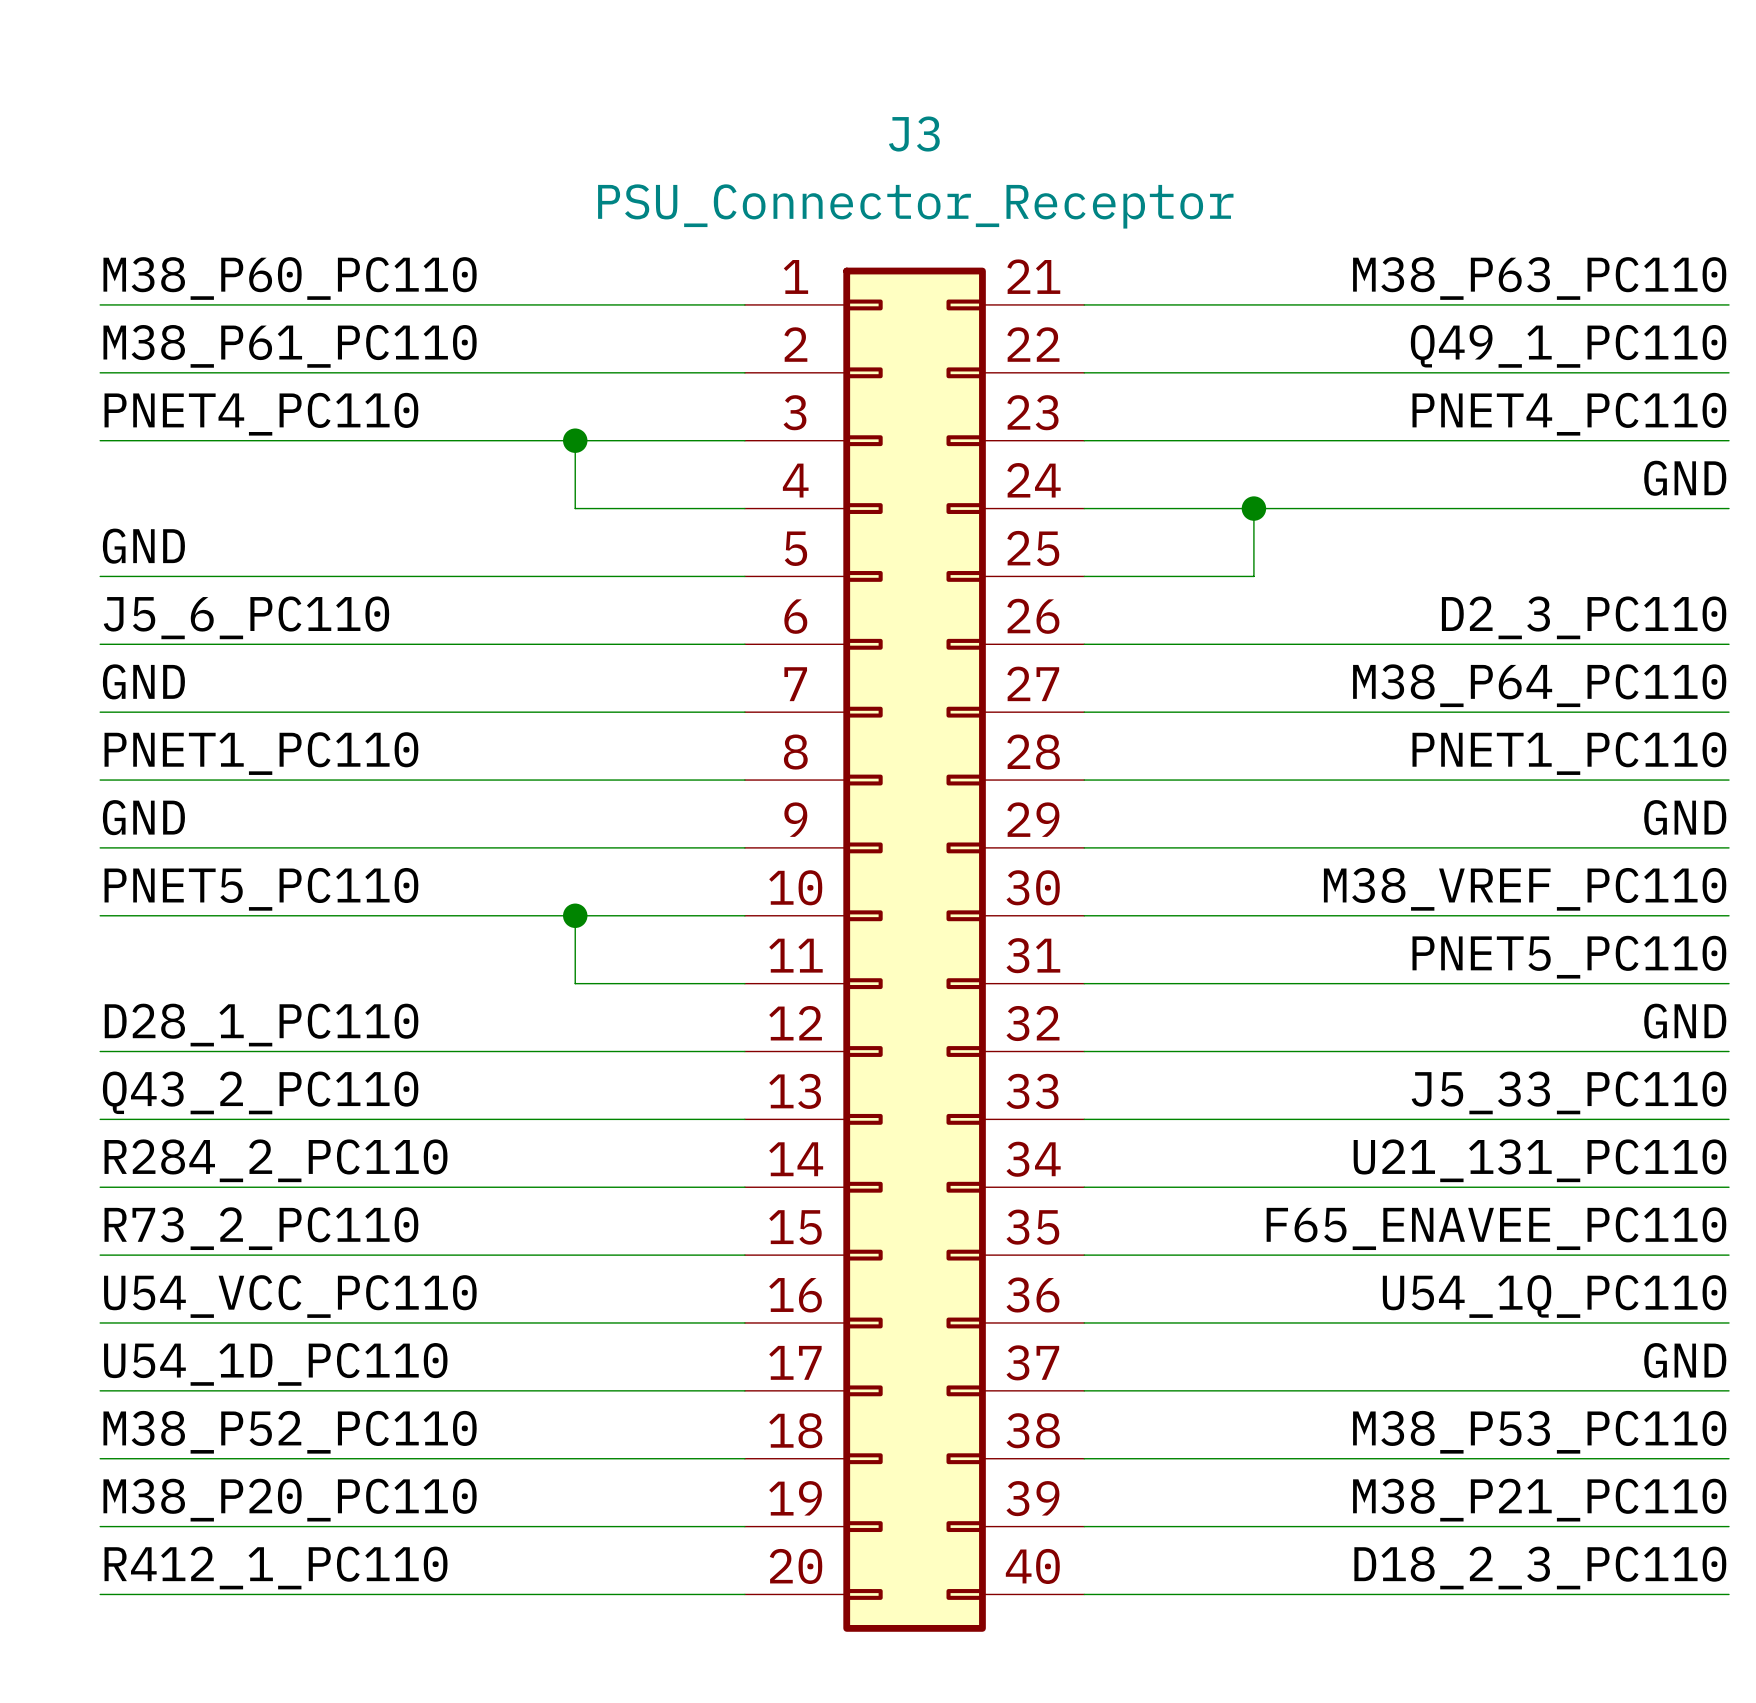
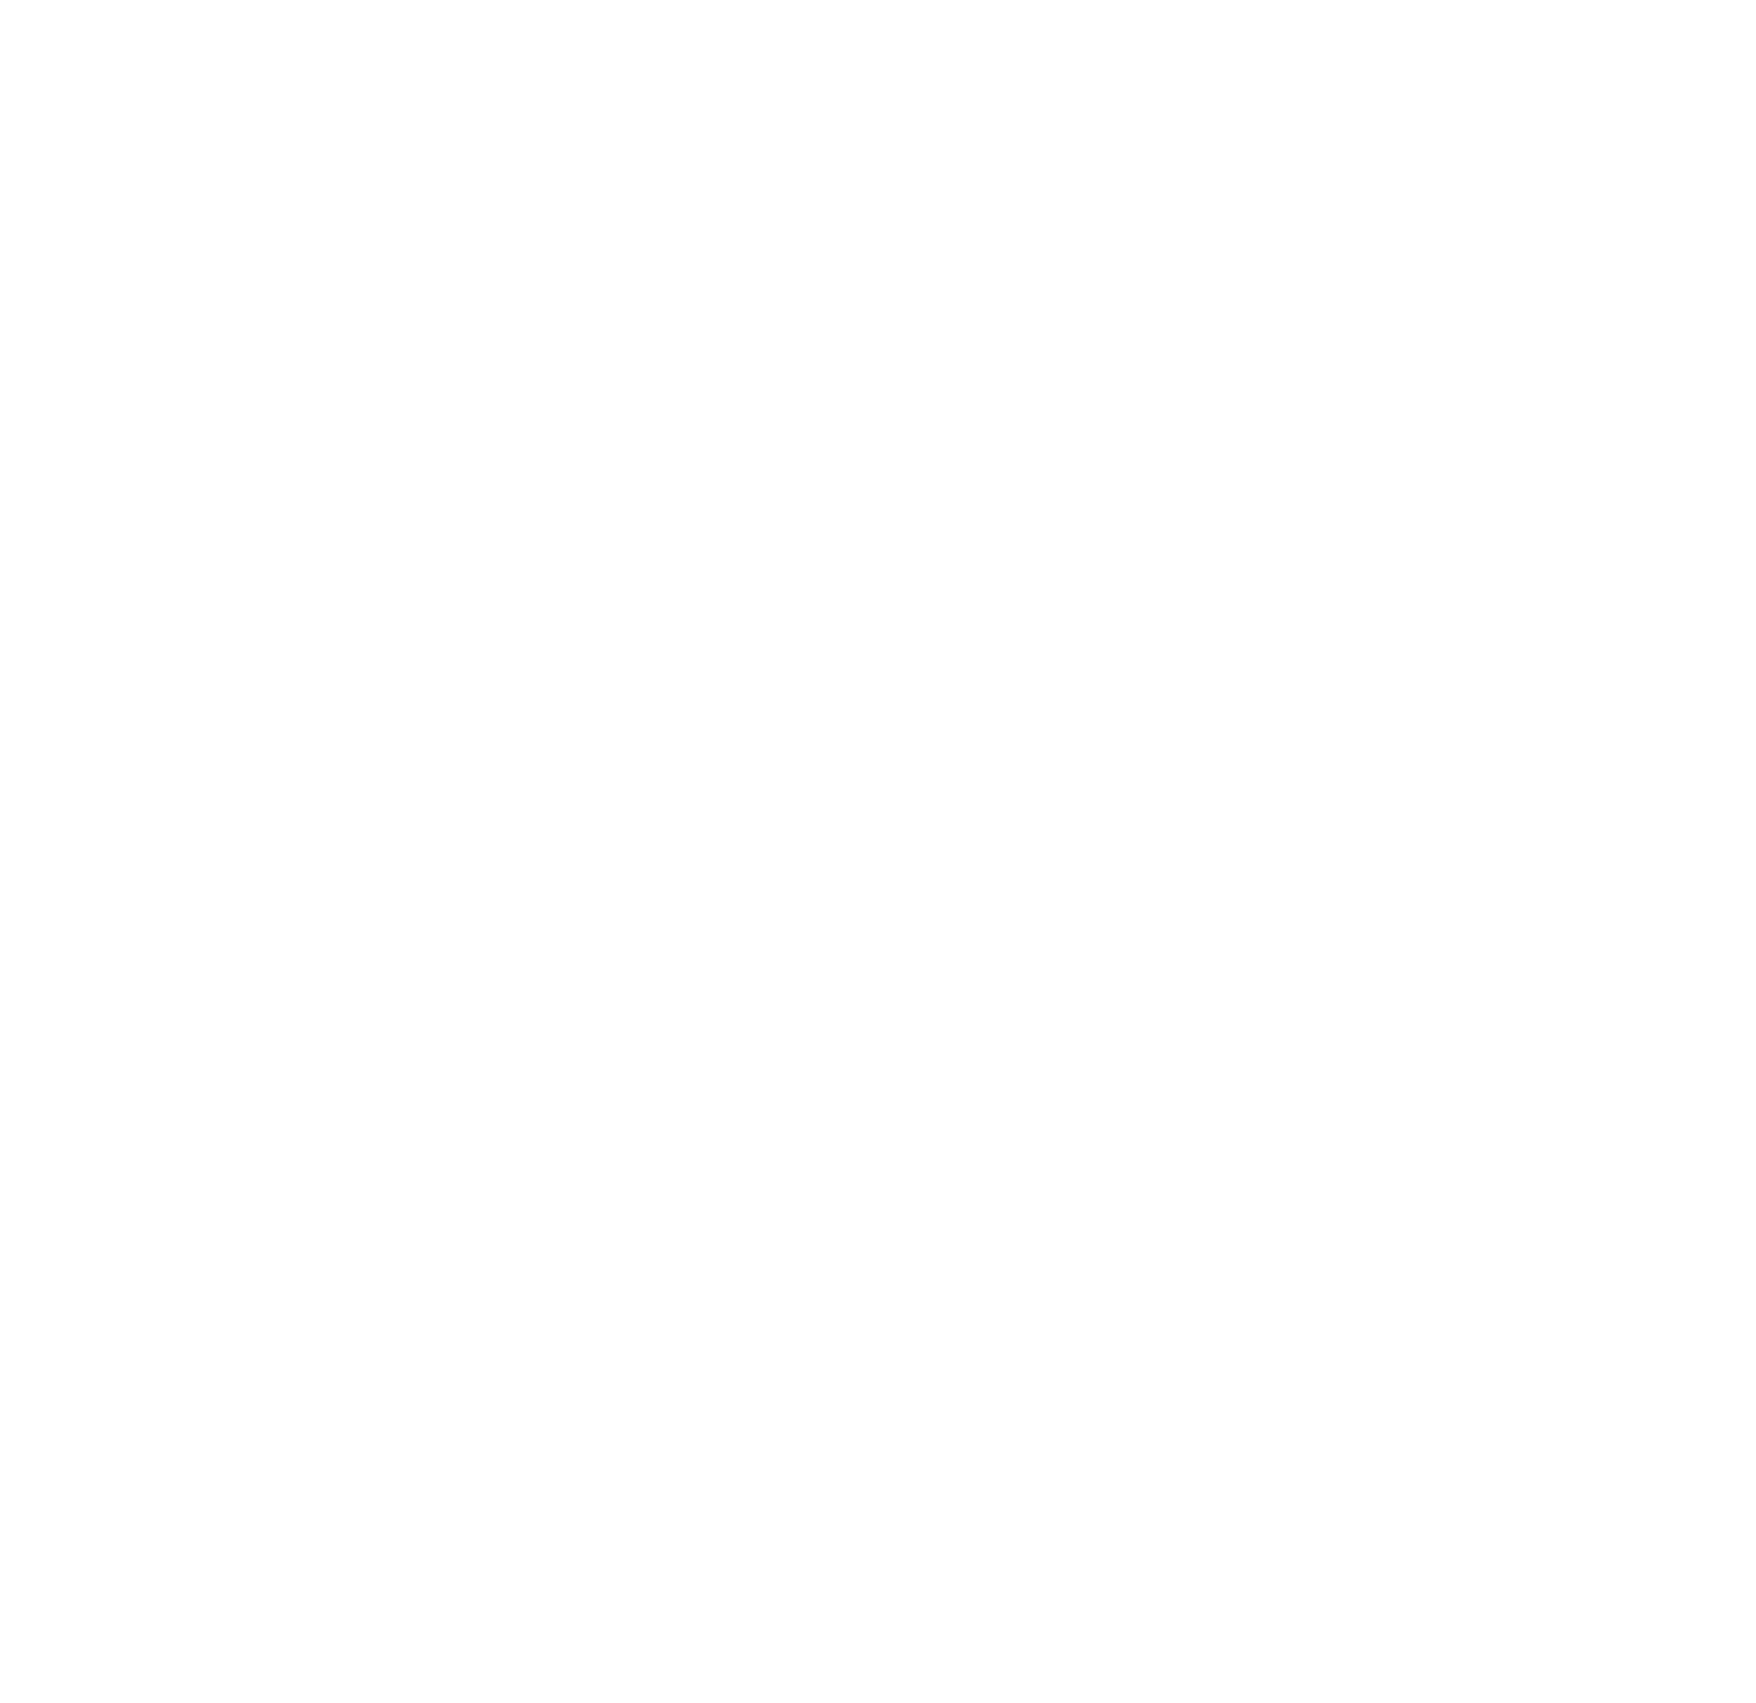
label: M38_P60_PC110 (290, 278) -> none
label: M38_P63_PC110 (1539, 278) -> none
wire: (100, 304) (744, 304) -> none
wire: (1084, 304) (1729, 304) -> none
label: M38_P61_PC110 (290, 346) -> none
label: Q49_1_PC110 (1568, 346) -> none
wire: (100, 372) (744, 372) -> none
wire: (1084, 372) (1729, 372) -> none
label: PNET4_PC110 (261, 414) -> none
label: PNET4_PC110 (1569, 414) -> none
wire: (100, 440) (744, 440) -> none
wire: (575, 440) (575, 508) (744, 508) -> none
junction: (575, 440) -> none
wire: (1084, 440) (1729, 440) -> none
label: GND (1685, 478) -> none
wire: (1084, 508) (1729, 508) -> none
wire: (1253, 508) (1253, 576) (1084, 576) -> none
junction: (1253, 508) -> none
label: GND (143, 546) -> none
wire: (100, 576) (744, 576) -> none
label: J5_6_PC110 (246, 617) -> none
label: D2_3_PC110 (1584, 617) -> none
wire: (100, 644) (744, 644) -> none
wire: (1084, 644) (1729, 644) -> none
label: GND (143, 681) -> none
label: M38_P64_PC110 (1539, 685) -> none
wire: (100, 712) (744, 712) -> none
wire: (1084, 712) (1729, 712) -> none
label: PNET1_PC110 (261, 753) -> none
label: PNET1_PC110 (1569, 753) -> none
wire: (100, 780) (744, 780) -> none
wire: (1084, 780) (1729, 780) -> none
label: GND (143, 817) -> none
label: GND (1685, 817) -> none
wire: (100, 847) (744, 847) -> none
wire: (1084, 847) (1729, 847) -> none
label: PNET5_PC110 (261, 889) -> none
label: M38_VREF_PC110 (1525, 889) -> none
wire: (100, 915) (744, 915) -> none
wire: (575, 915) (575, 983) (744, 983) -> none
junction: (575, 915) -> none
wire: (1084, 915) (1729, 915) -> none
J3: PSU_Connector_Receptor (914, 949) -> none
label: PNET5_PC110 (1569, 957) -> none
wire: (1084, 983) (1729, 983) -> none
label: GND (1685, 1021) -> none
label: D28_1_PC110 (261, 1025) -> none
wire: (100, 1051) (744, 1051) -> none
wire: (1084, 1051) (1729, 1051) -> none
label: Q43_2_PC110 (260, 1092) -> none
label: J5_33_PC110 (1569, 1092) -> none
wire: (100, 1119) (744, 1119) -> none
wire: (1084, 1119) (1729, 1119) -> none
label: R284_2_PC110 (276, 1160) -> none
label: U21_131_PC110 (1539, 1160) -> none
wire: (100, 1187) (744, 1187) -> none
wire: (1084, 1187) (1729, 1187) -> none
label: R73_2_PC110 (261, 1228) -> none
label: F65_ENAVEE_PC110 (1496, 1228) -> none
wire: (100, 1255) (744, 1255) -> none
wire: (1084, 1255) (1729, 1255) -> none
label: U54_VCC_PC110 (290, 1296) -> none
label: U54_1Q_PC110 (1554, 1296) -> none
wire: (100, 1322) (744, 1322) -> none
wire: (1084, 1322) (1729, 1322) -> none
label: GND (1685, 1360) -> none
label: U54_1D_PC110 (275, 1364) -> none
wire: (100, 1390) (744, 1390) -> none
wire: (1084, 1390) (1729, 1390) -> none
label: M38_P52_PC110 (290, 1432) -> none
label: M38_P53_PC110 (1539, 1432) -> none
wire: (100, 1458) (744, 1458) -> none
wire: (1084, 1458) (1729, 1458) -> none
label: M38_P20_PC110 (290, 1500) -> none
label: M38_P21_PC110 (1539, 1500) -> none
wire: (100, 1526) (744, 1526) -> none
wire: (1084, 1526) (1729, 1526) -> none
label: R412_1_PC110 (276, 1567) -> none
label: D18_2_3_PC110 (1540, 1567) -> none
wire: (100, 1594) (744, 1594) -> none
wire: (1084, 1594) (1729, 1594) -> none

